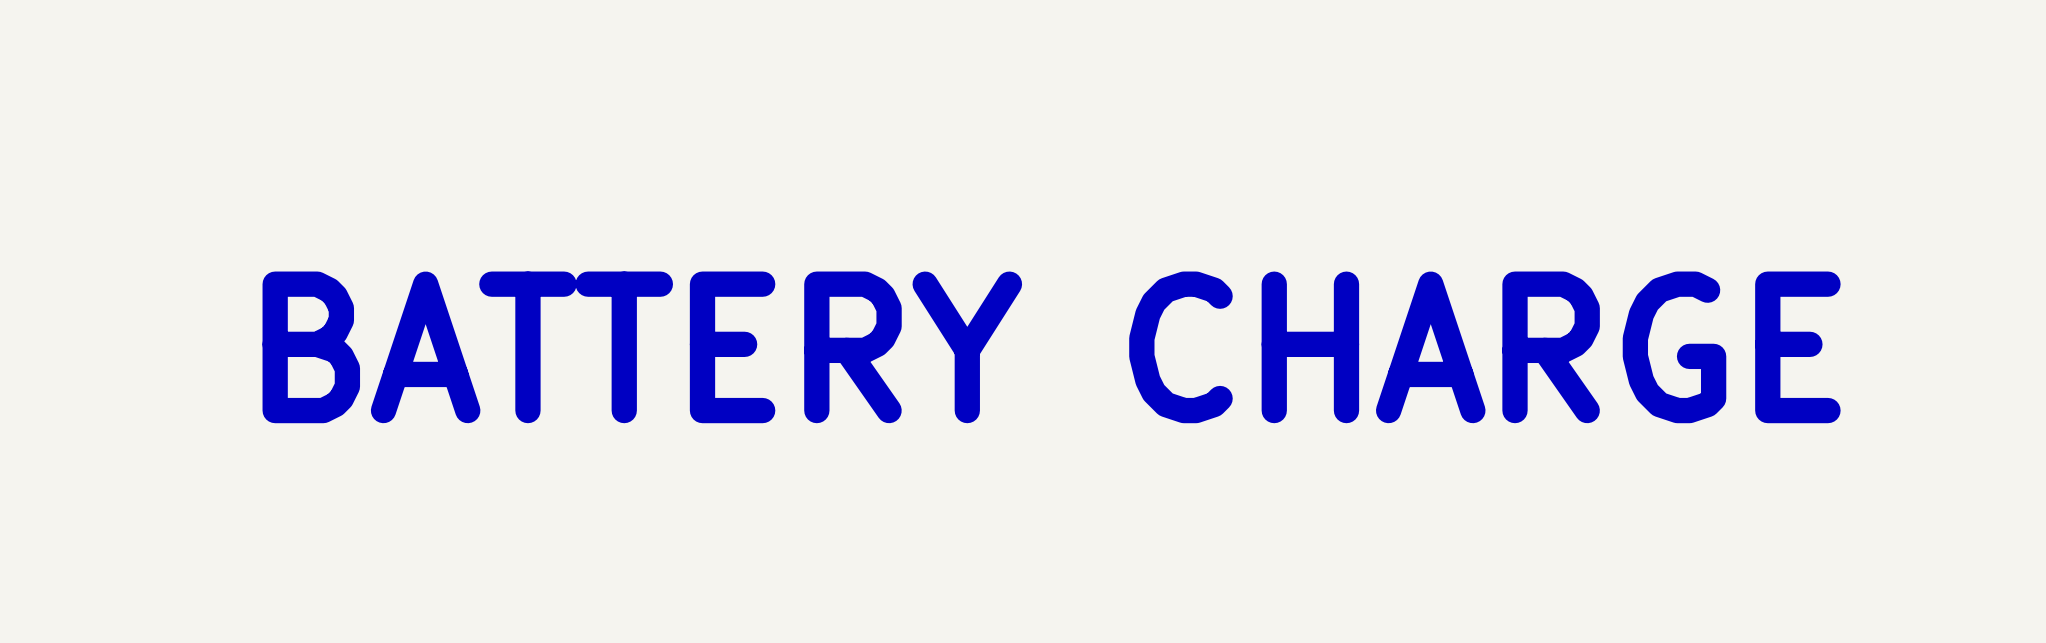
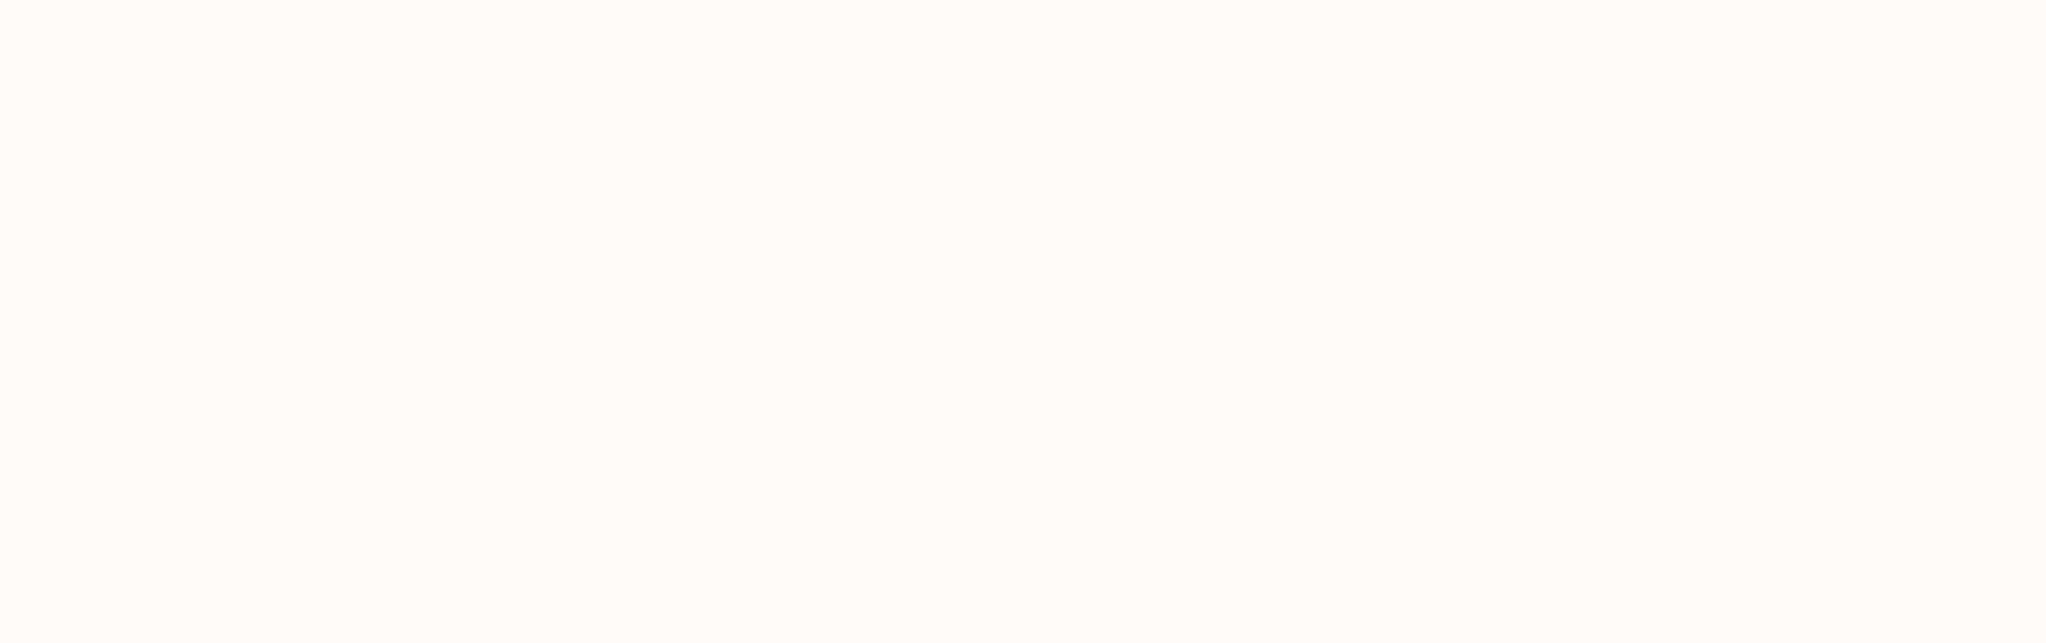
text: BATTERY CHARGE (1051, 347) -> none

